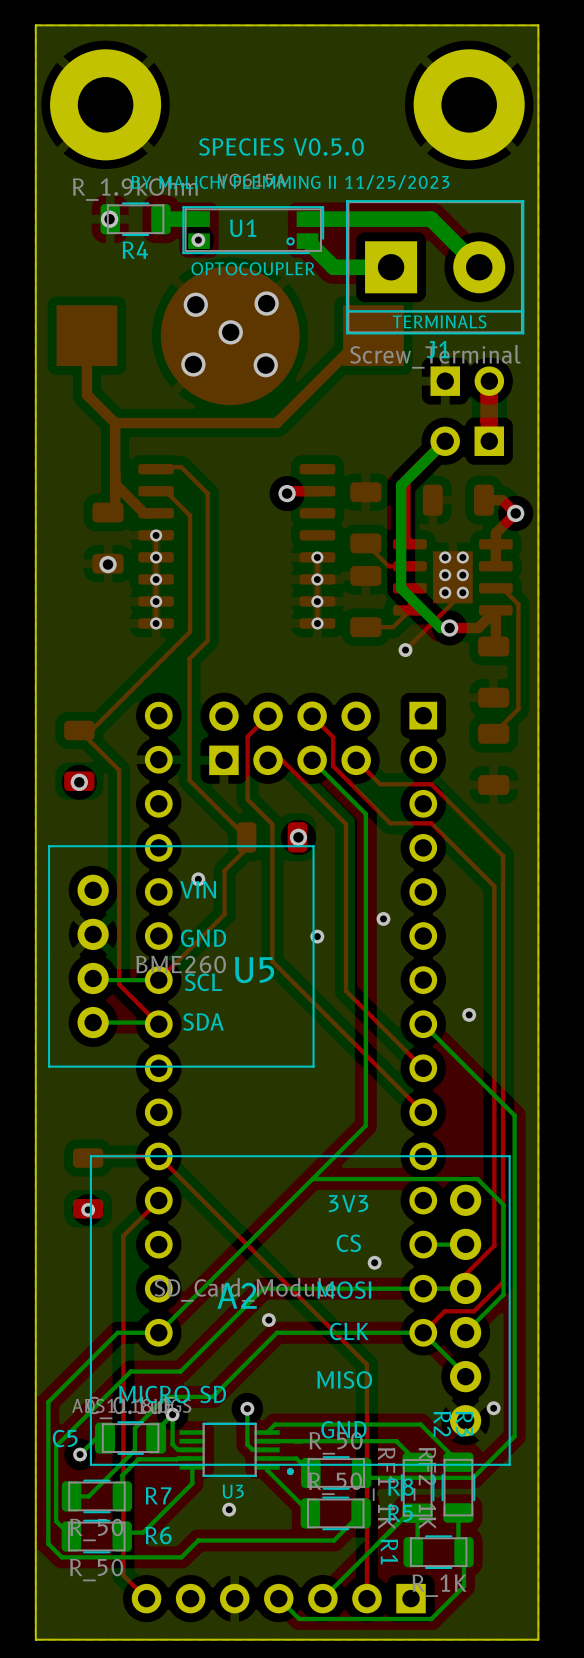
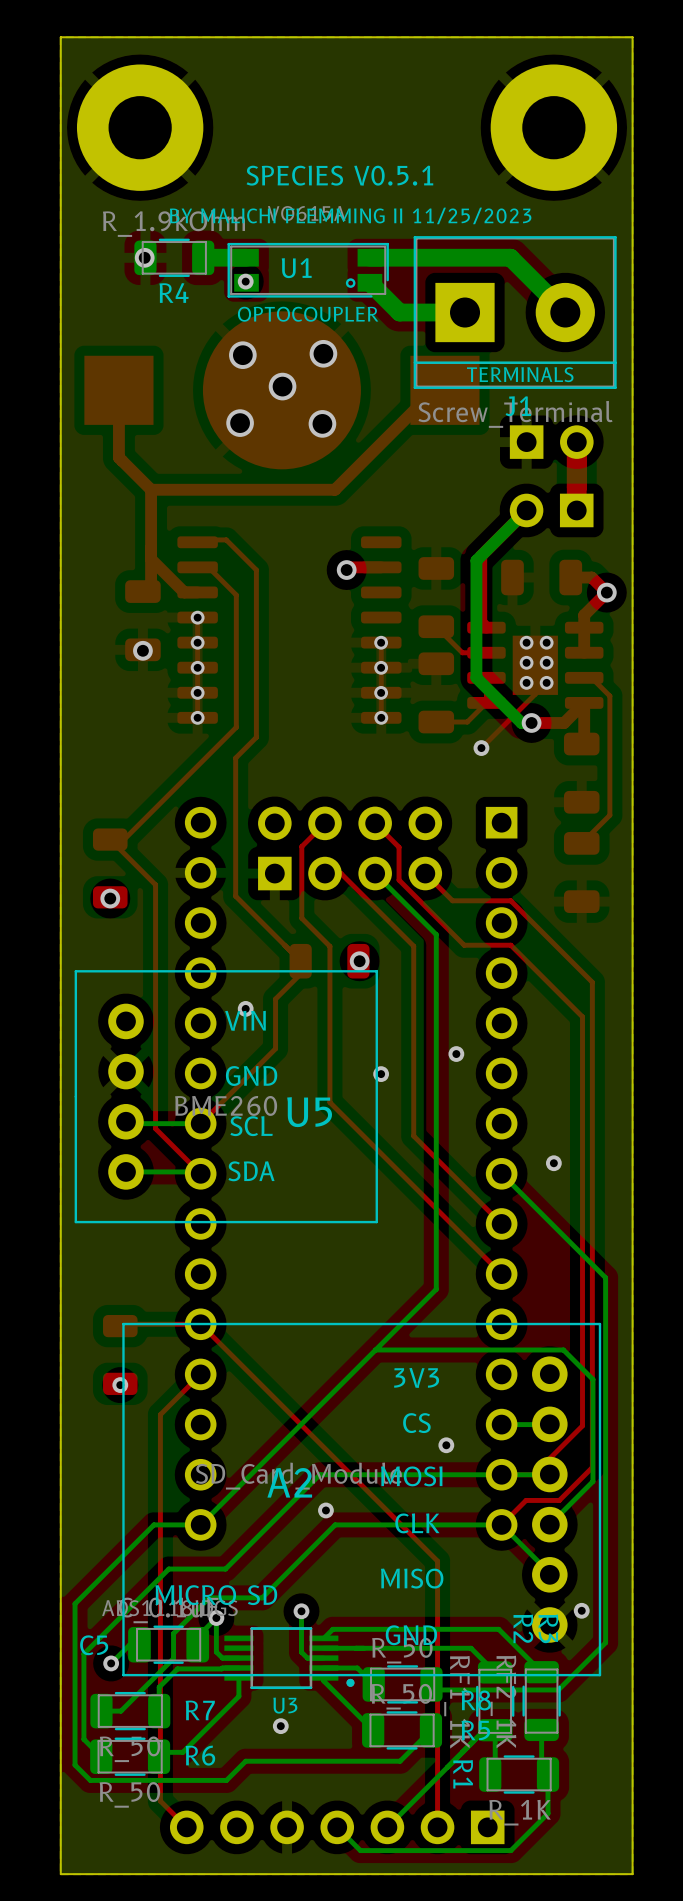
text: SPECIES V0.5.0 (281, 146) -> SPECIES V0.5.1 (339, 175)

